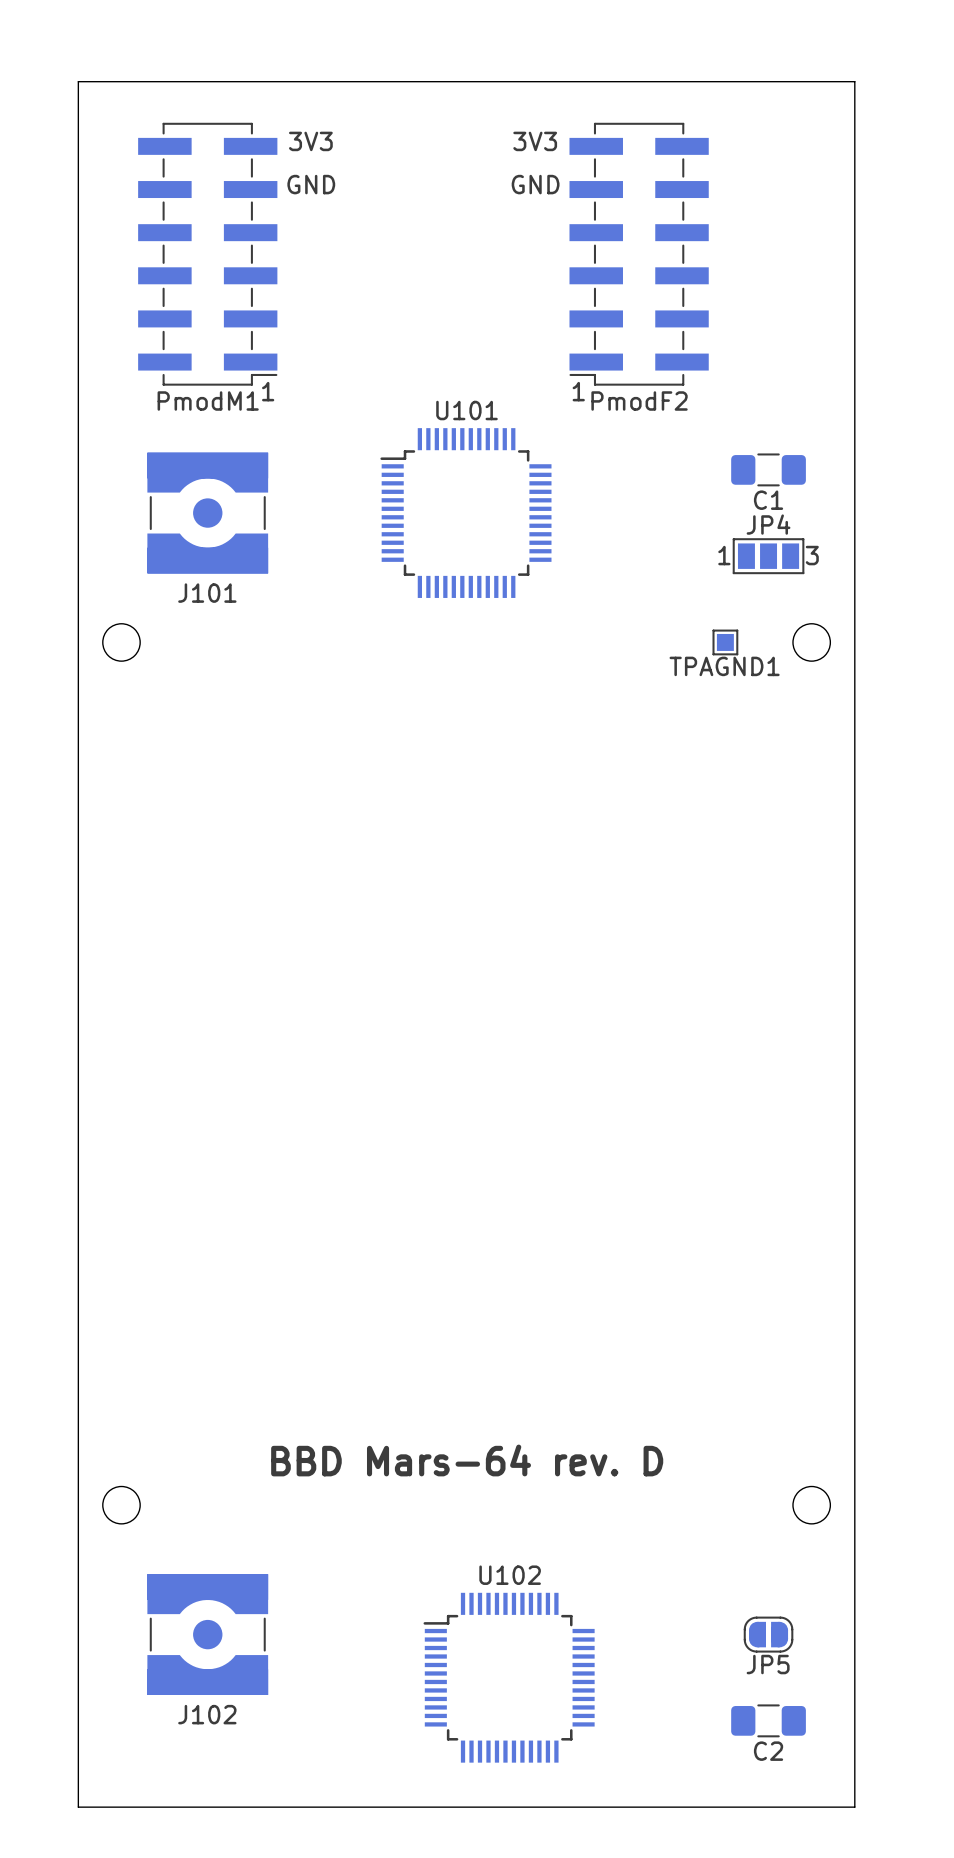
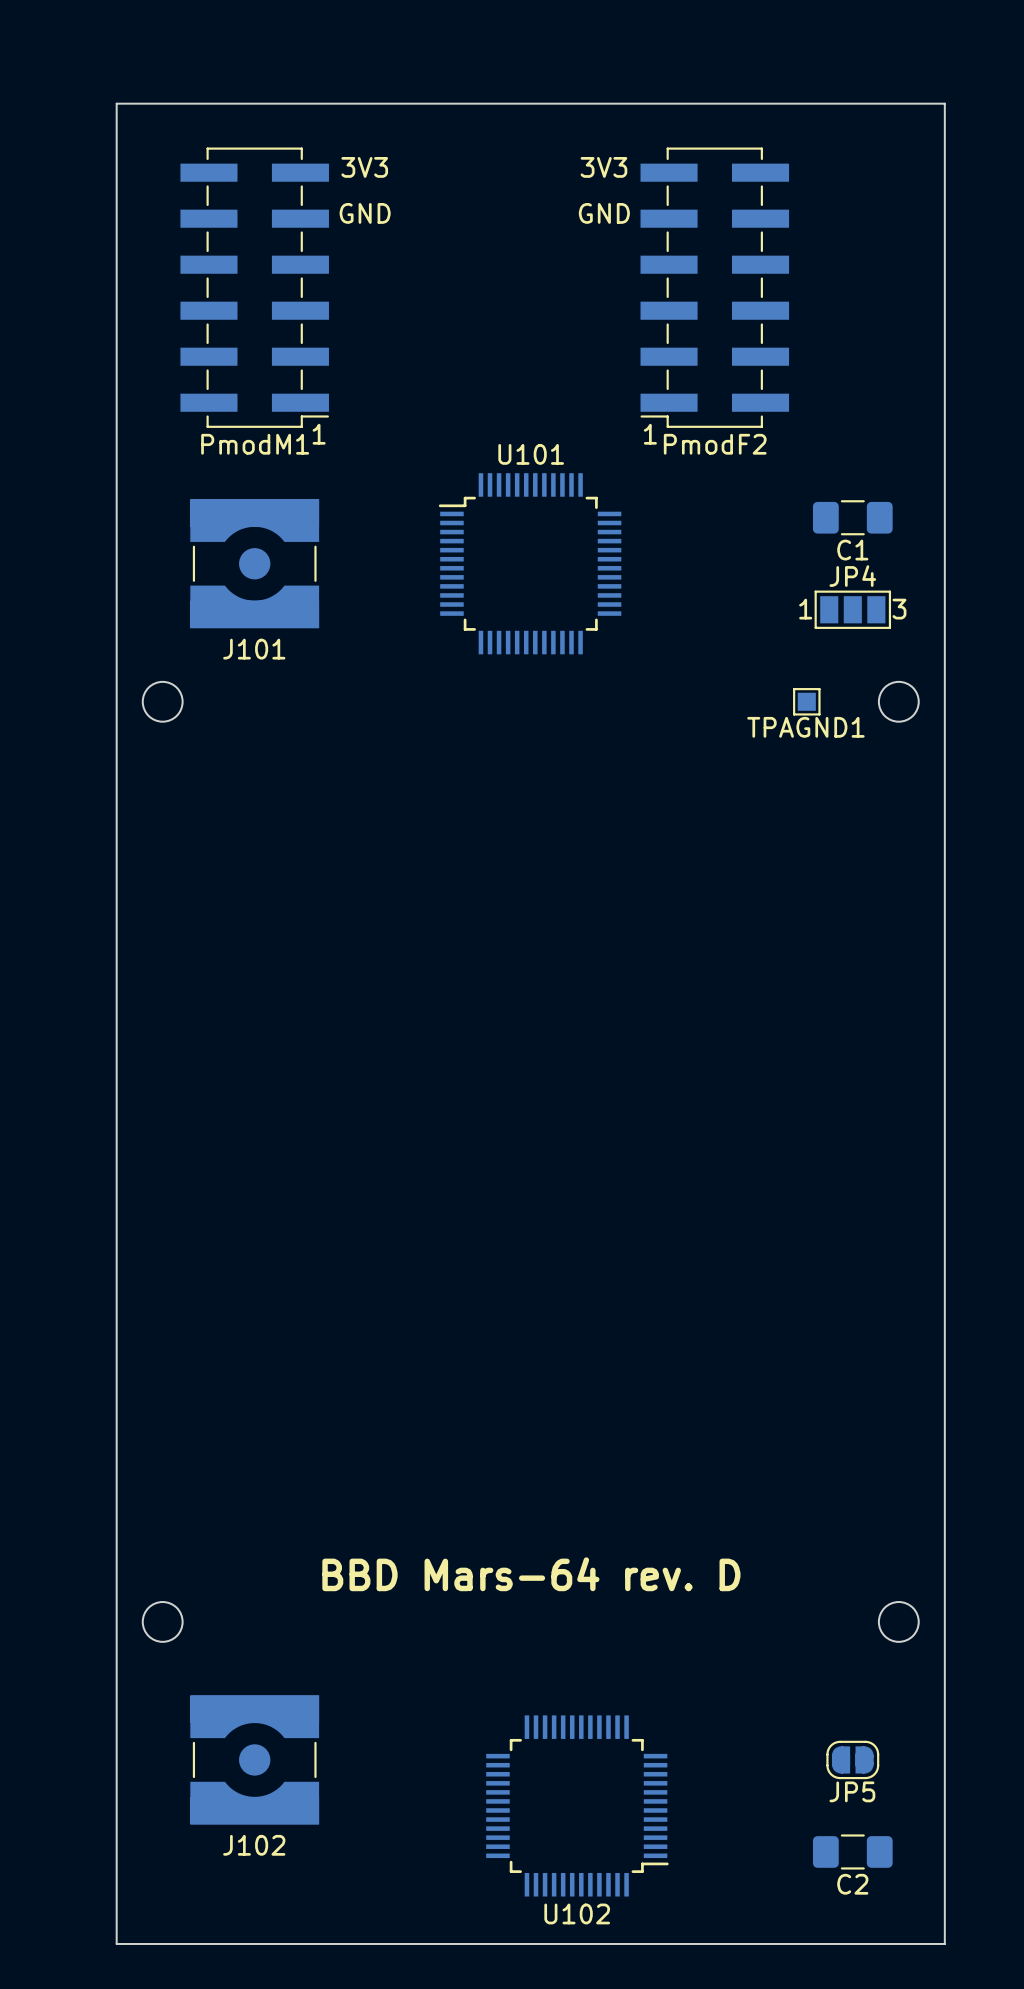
U102 rotation: 0° (509, 1677) -> 180° (577, 1805)

